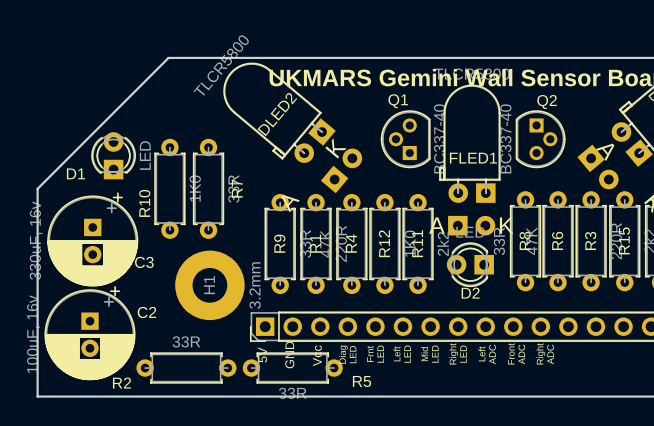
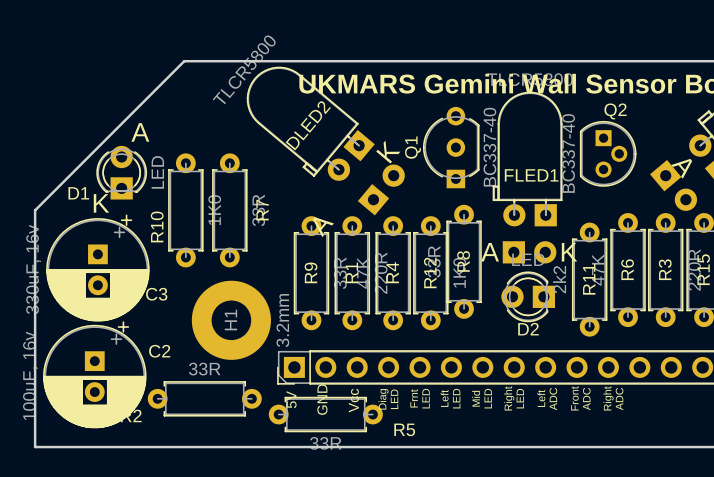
Q1 name position: Q1 (398, 101) -> Q1 (413, 147)
Q1 footprint: [380, 110, 431, 169] -> [422, 106, 480, 189]
text: none -> A (140, 132)
text position: K (335, 148) -> K (388, 152)
text: none -> K (101, 203)
R8 position: (525, 241) -> (464, 261)
R11 position: (418, 243) -> (589, 279)
R11 value position: 2k2 (443, 243) -> 2k2 (559, 279)
R2 position: (186, 368) -> (204, 398)

